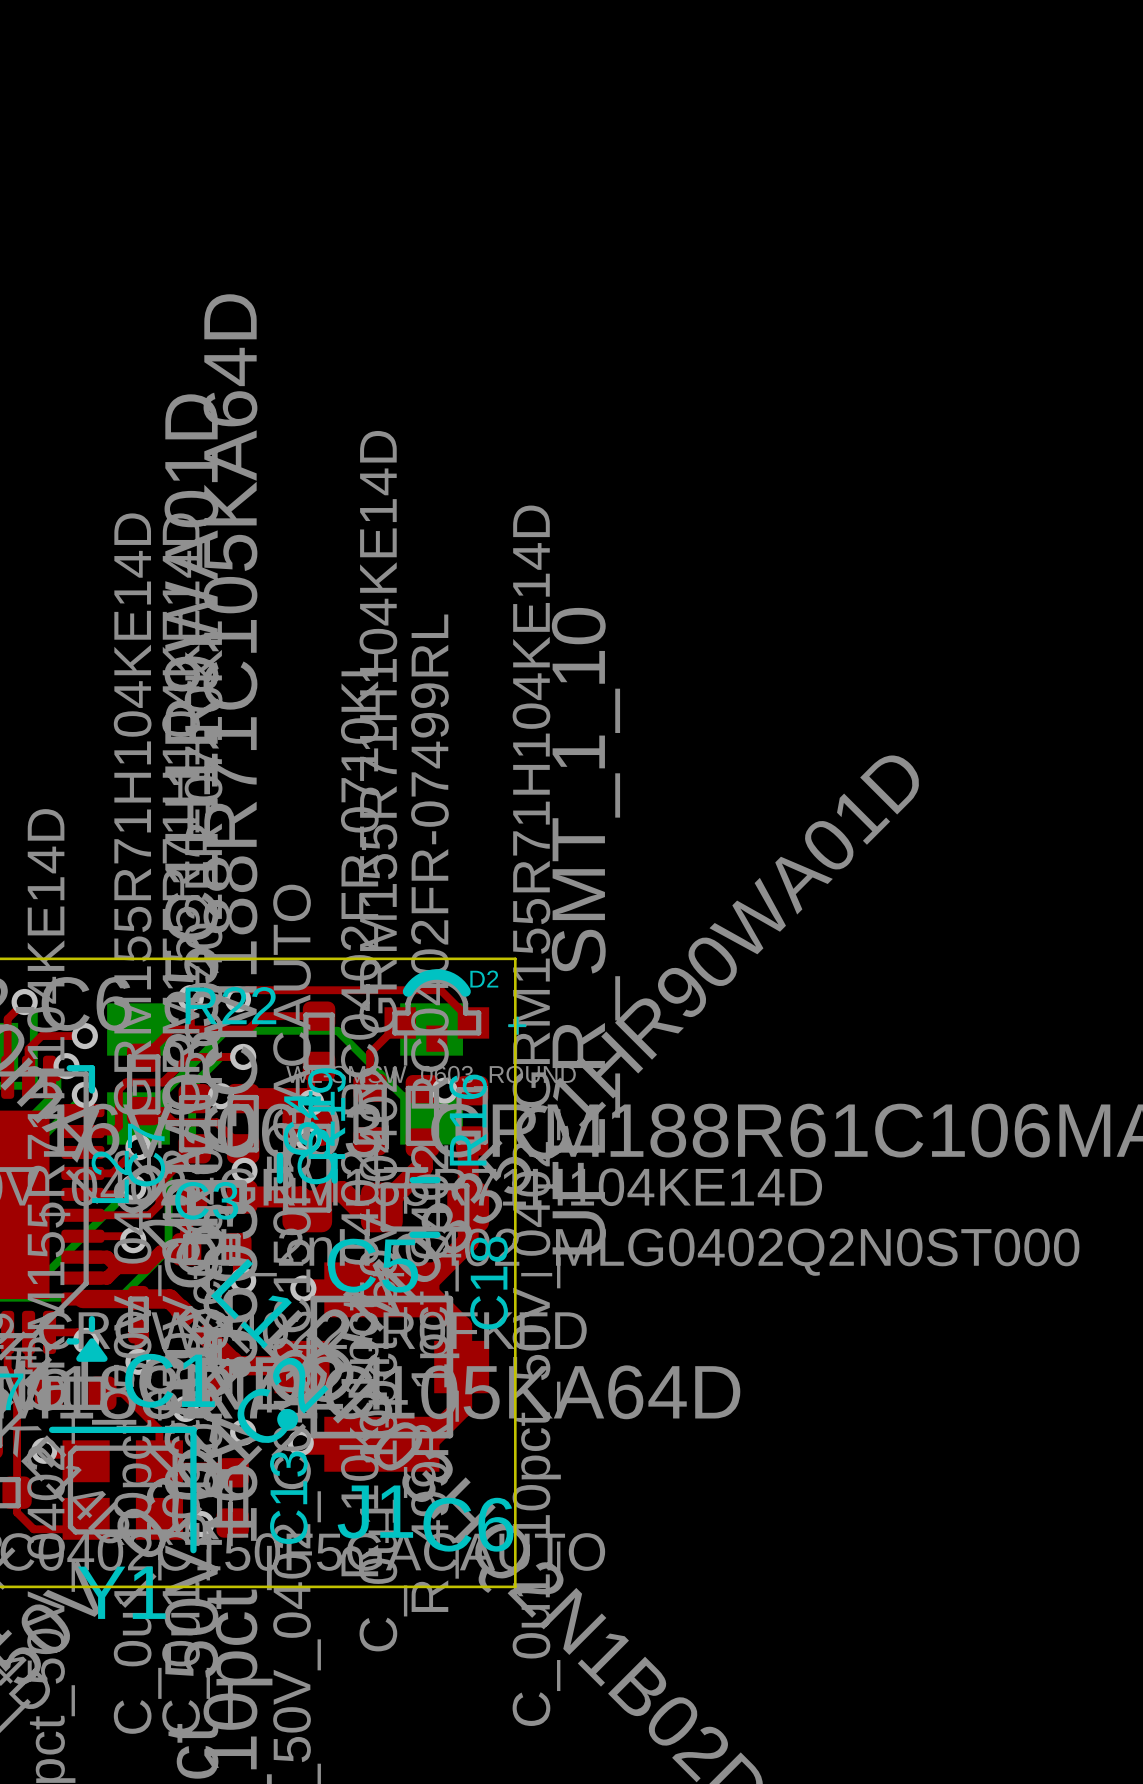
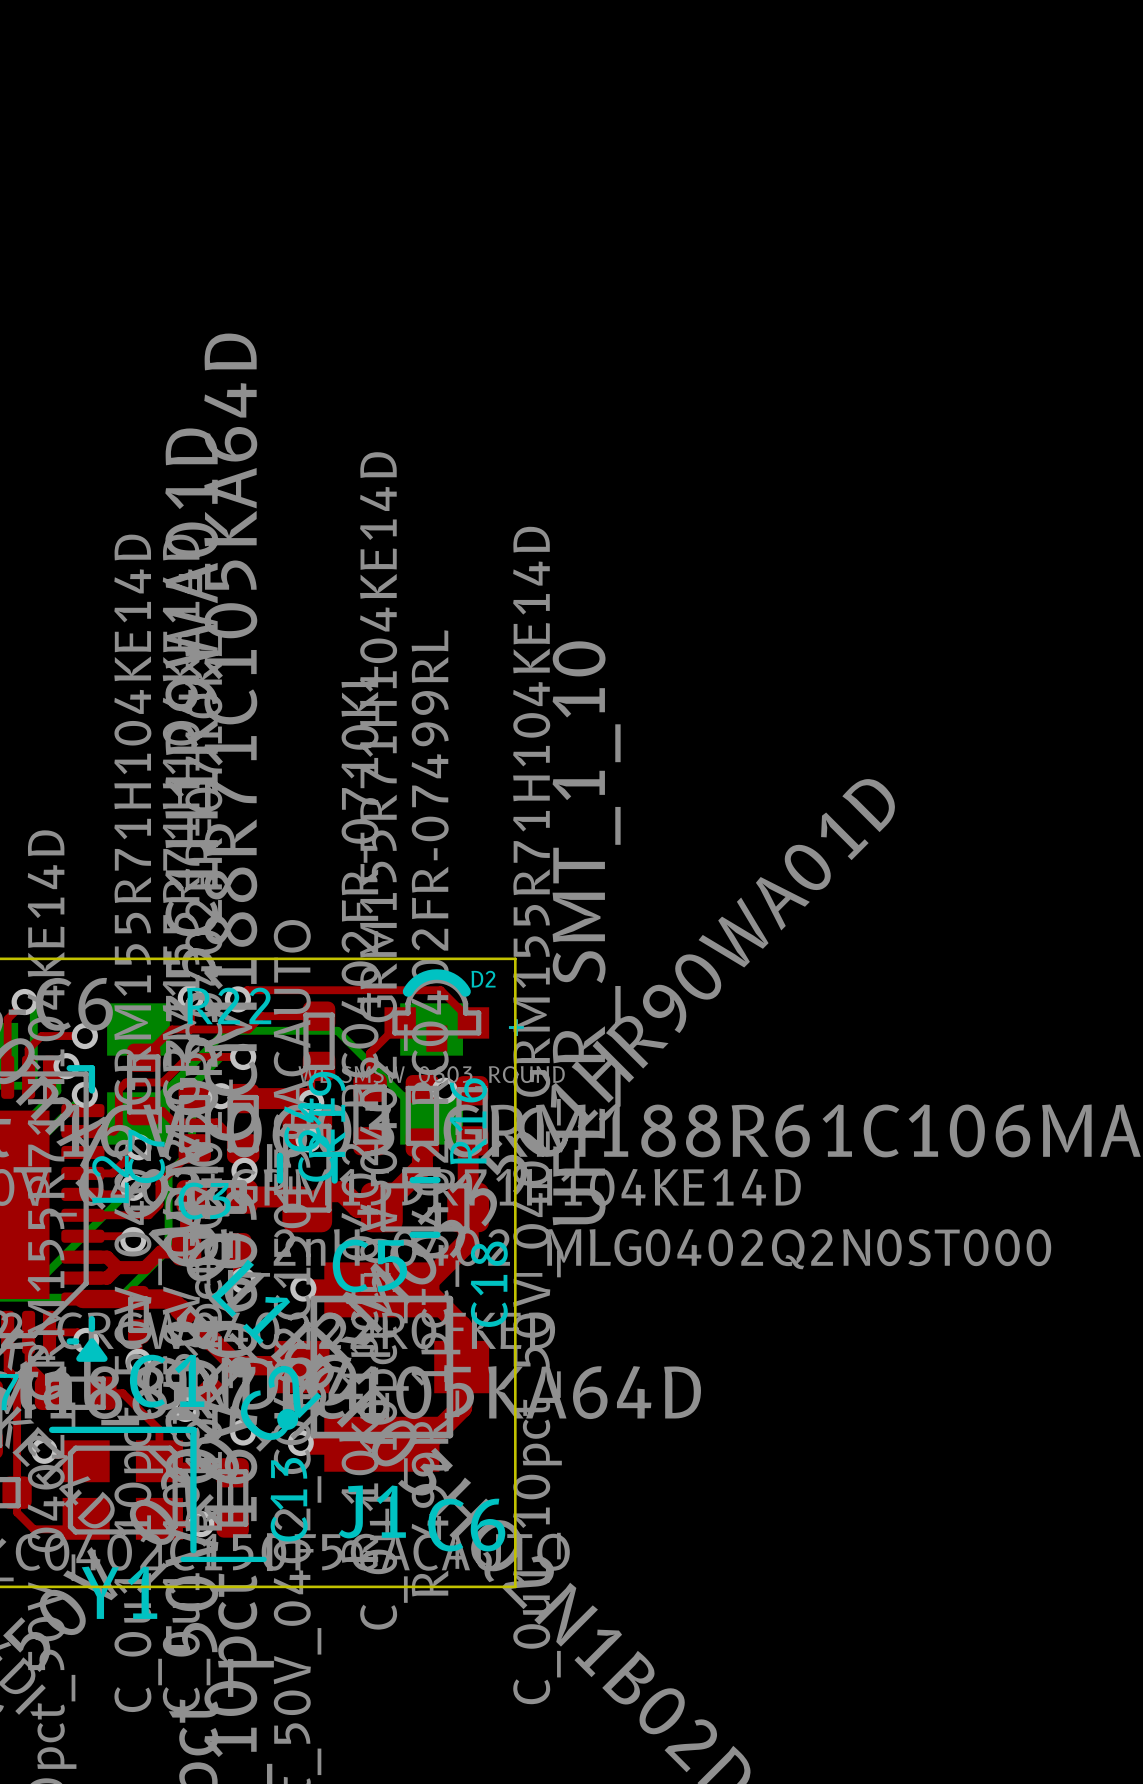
line: none -> (182, 1559) (264, 1559)

